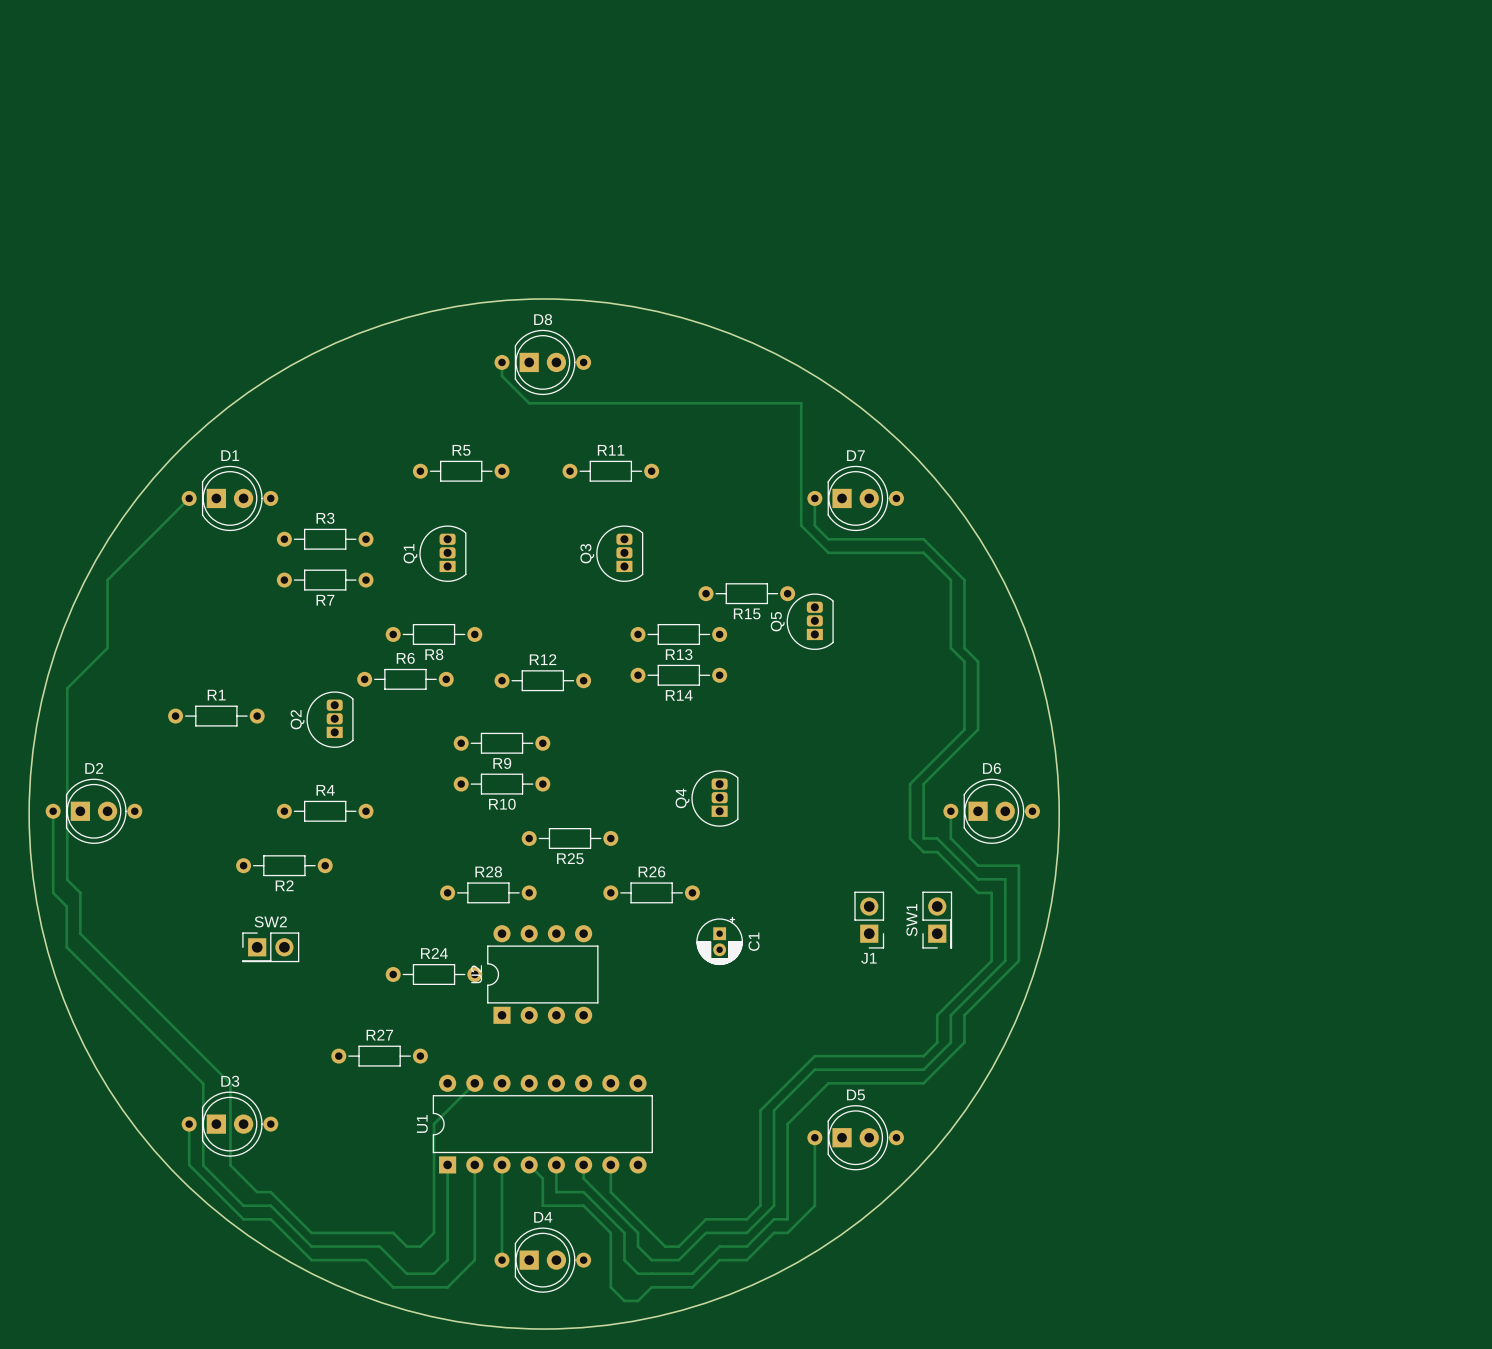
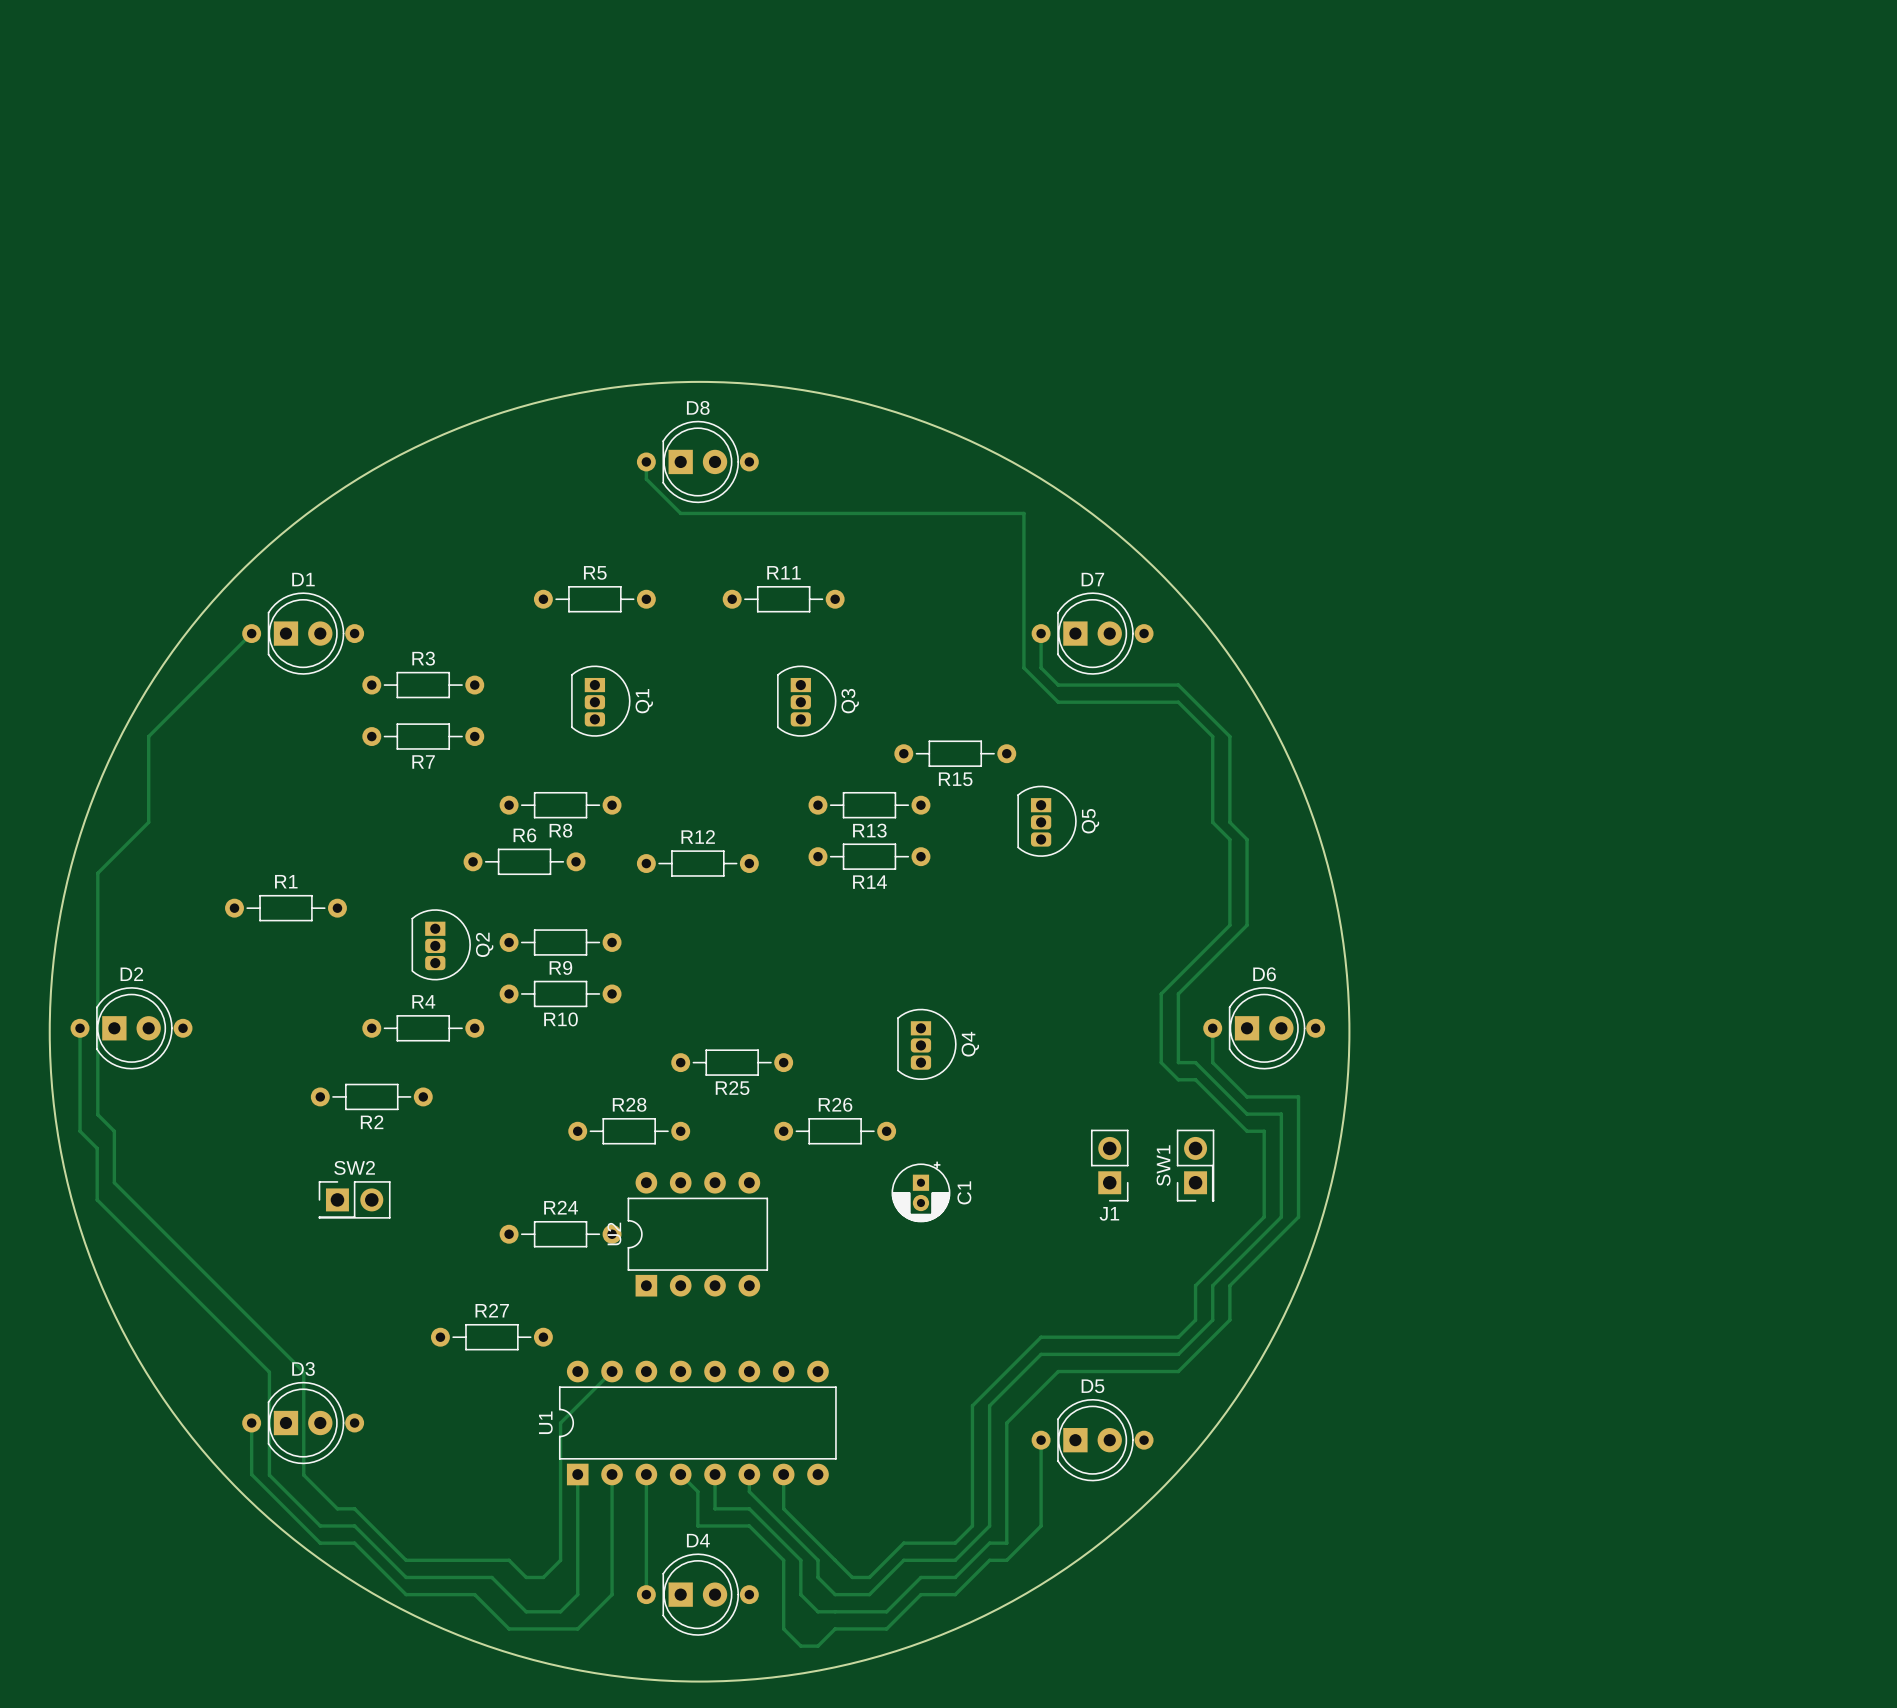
Q1 rotation: 0° (442, 553) -> 180° (600, 701)
Q3 rotation: 0° (619, 553) -> 180° (806, 701)
Q5 rotation: 0° (810, 621) -> 180° (1047, 821)
Q2 rotation: 0° (330, 719) -> 180° (441, 944)
R9 position: (502, 743) -> (560, 942)
R10 position: (502, 784) -> (560, 993)
Q4 rotation: 0° (714, 798) -> 180° (926, 1044)

